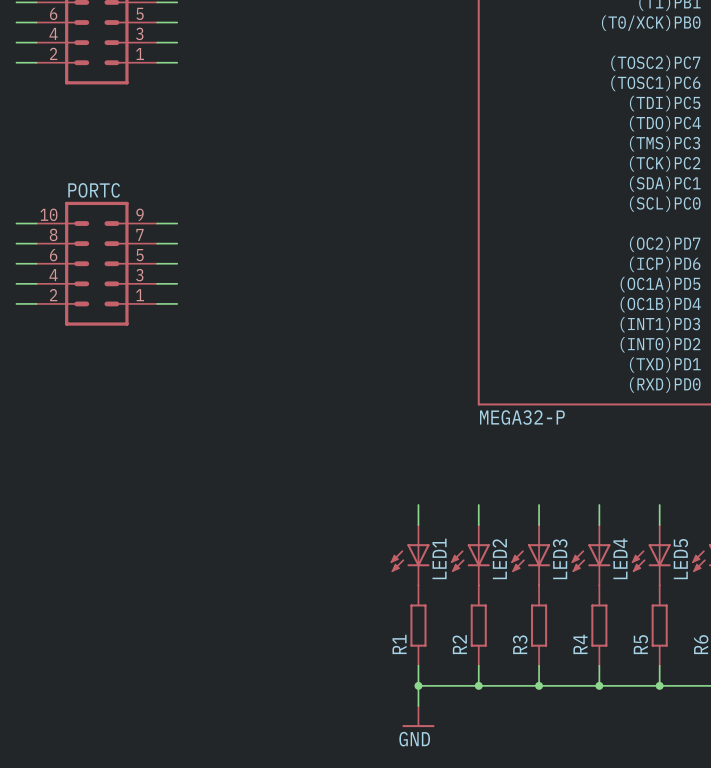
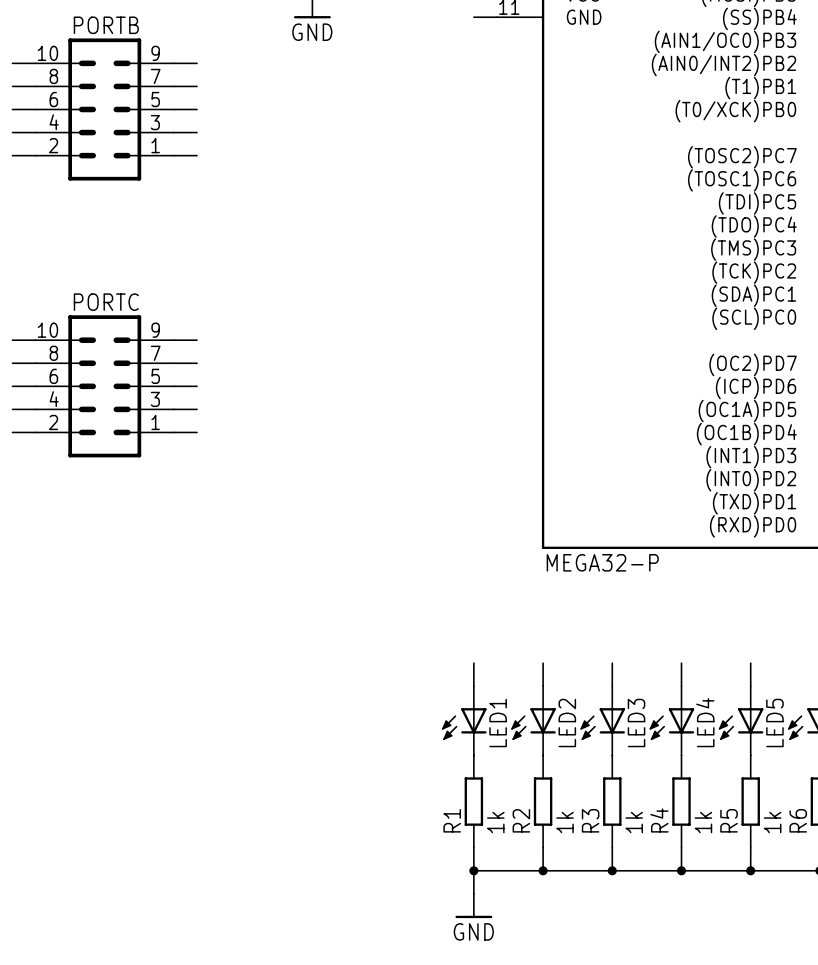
R1 value: none -> 1k (495, 822)
R2 value: none -> 1k (565, 822)
R3 value: none -> 1k (634, 822)
R4 value: none -> 1k (703, 822)
R5 value: none -> 1k (772, 822)

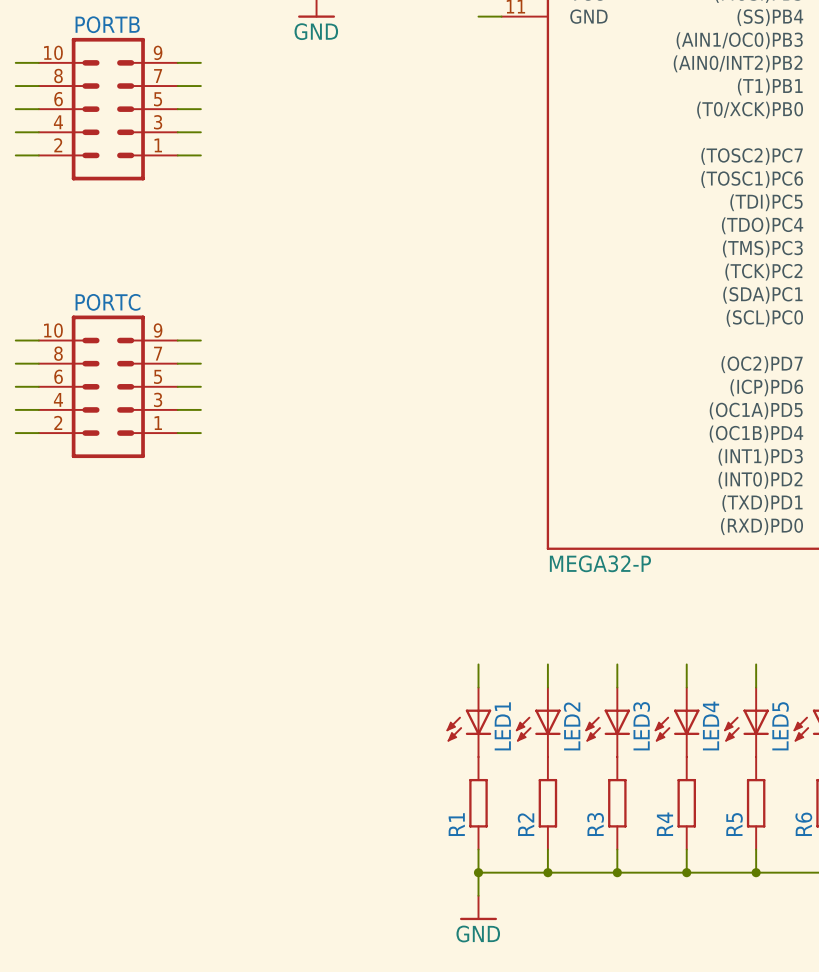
R1 value: 1k (495, 822) -> none
R2 value: 1k (565, 822) -> none
R3 value: 1k (634, 822) -> none
R4 value: 1k (703, 822) -> none
R5 value: 1k (772, 822) -> none

